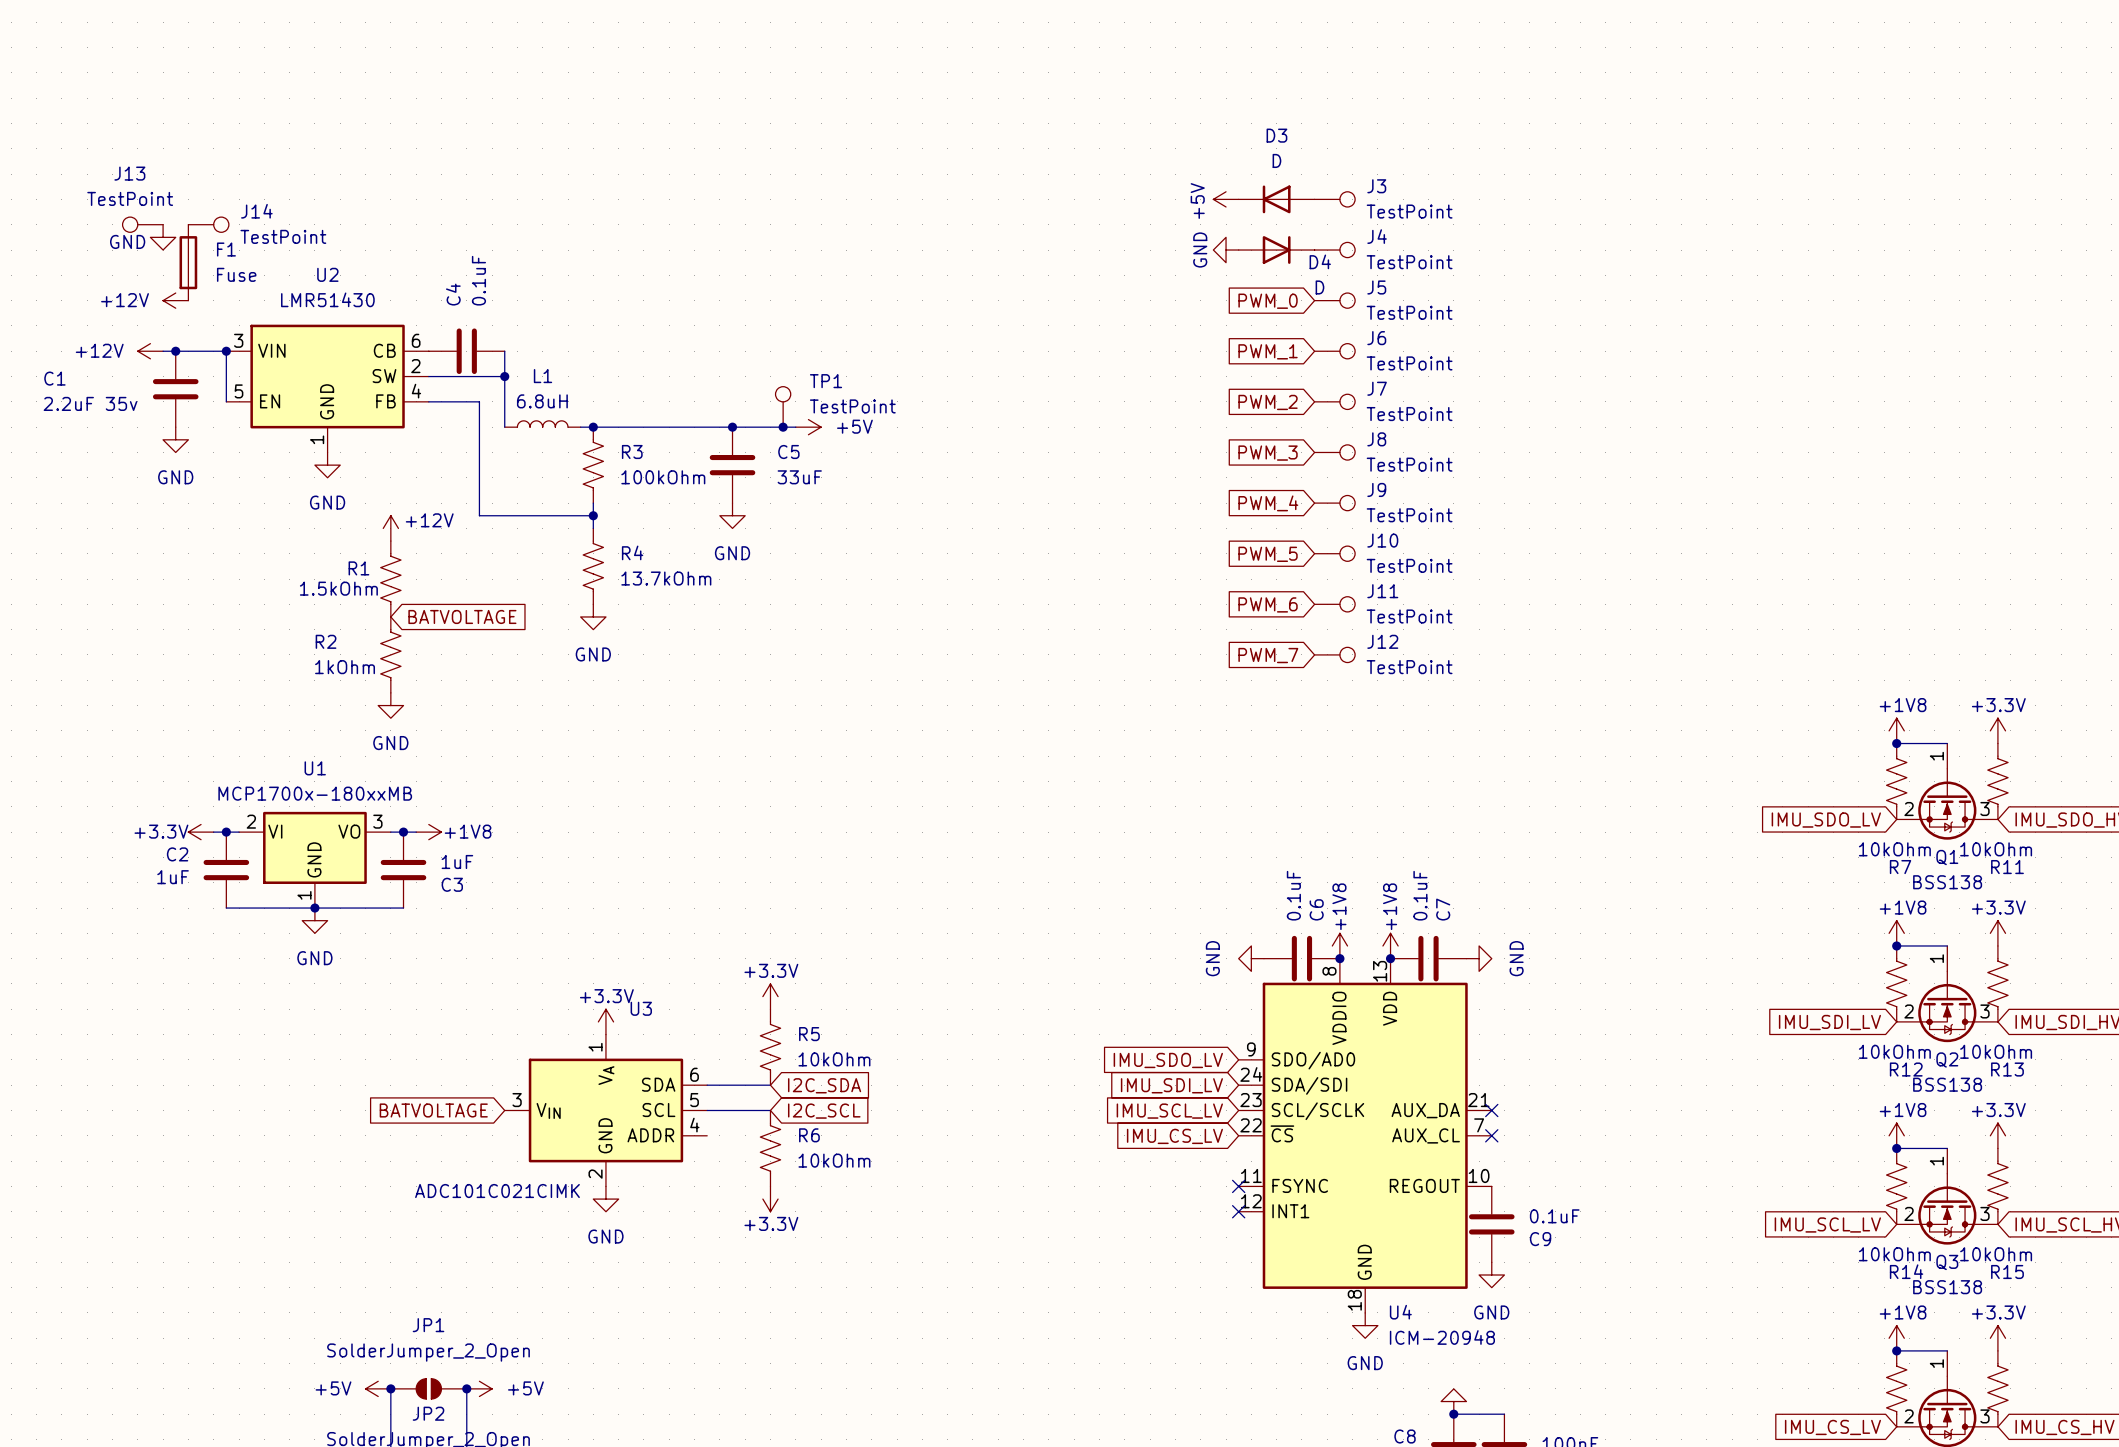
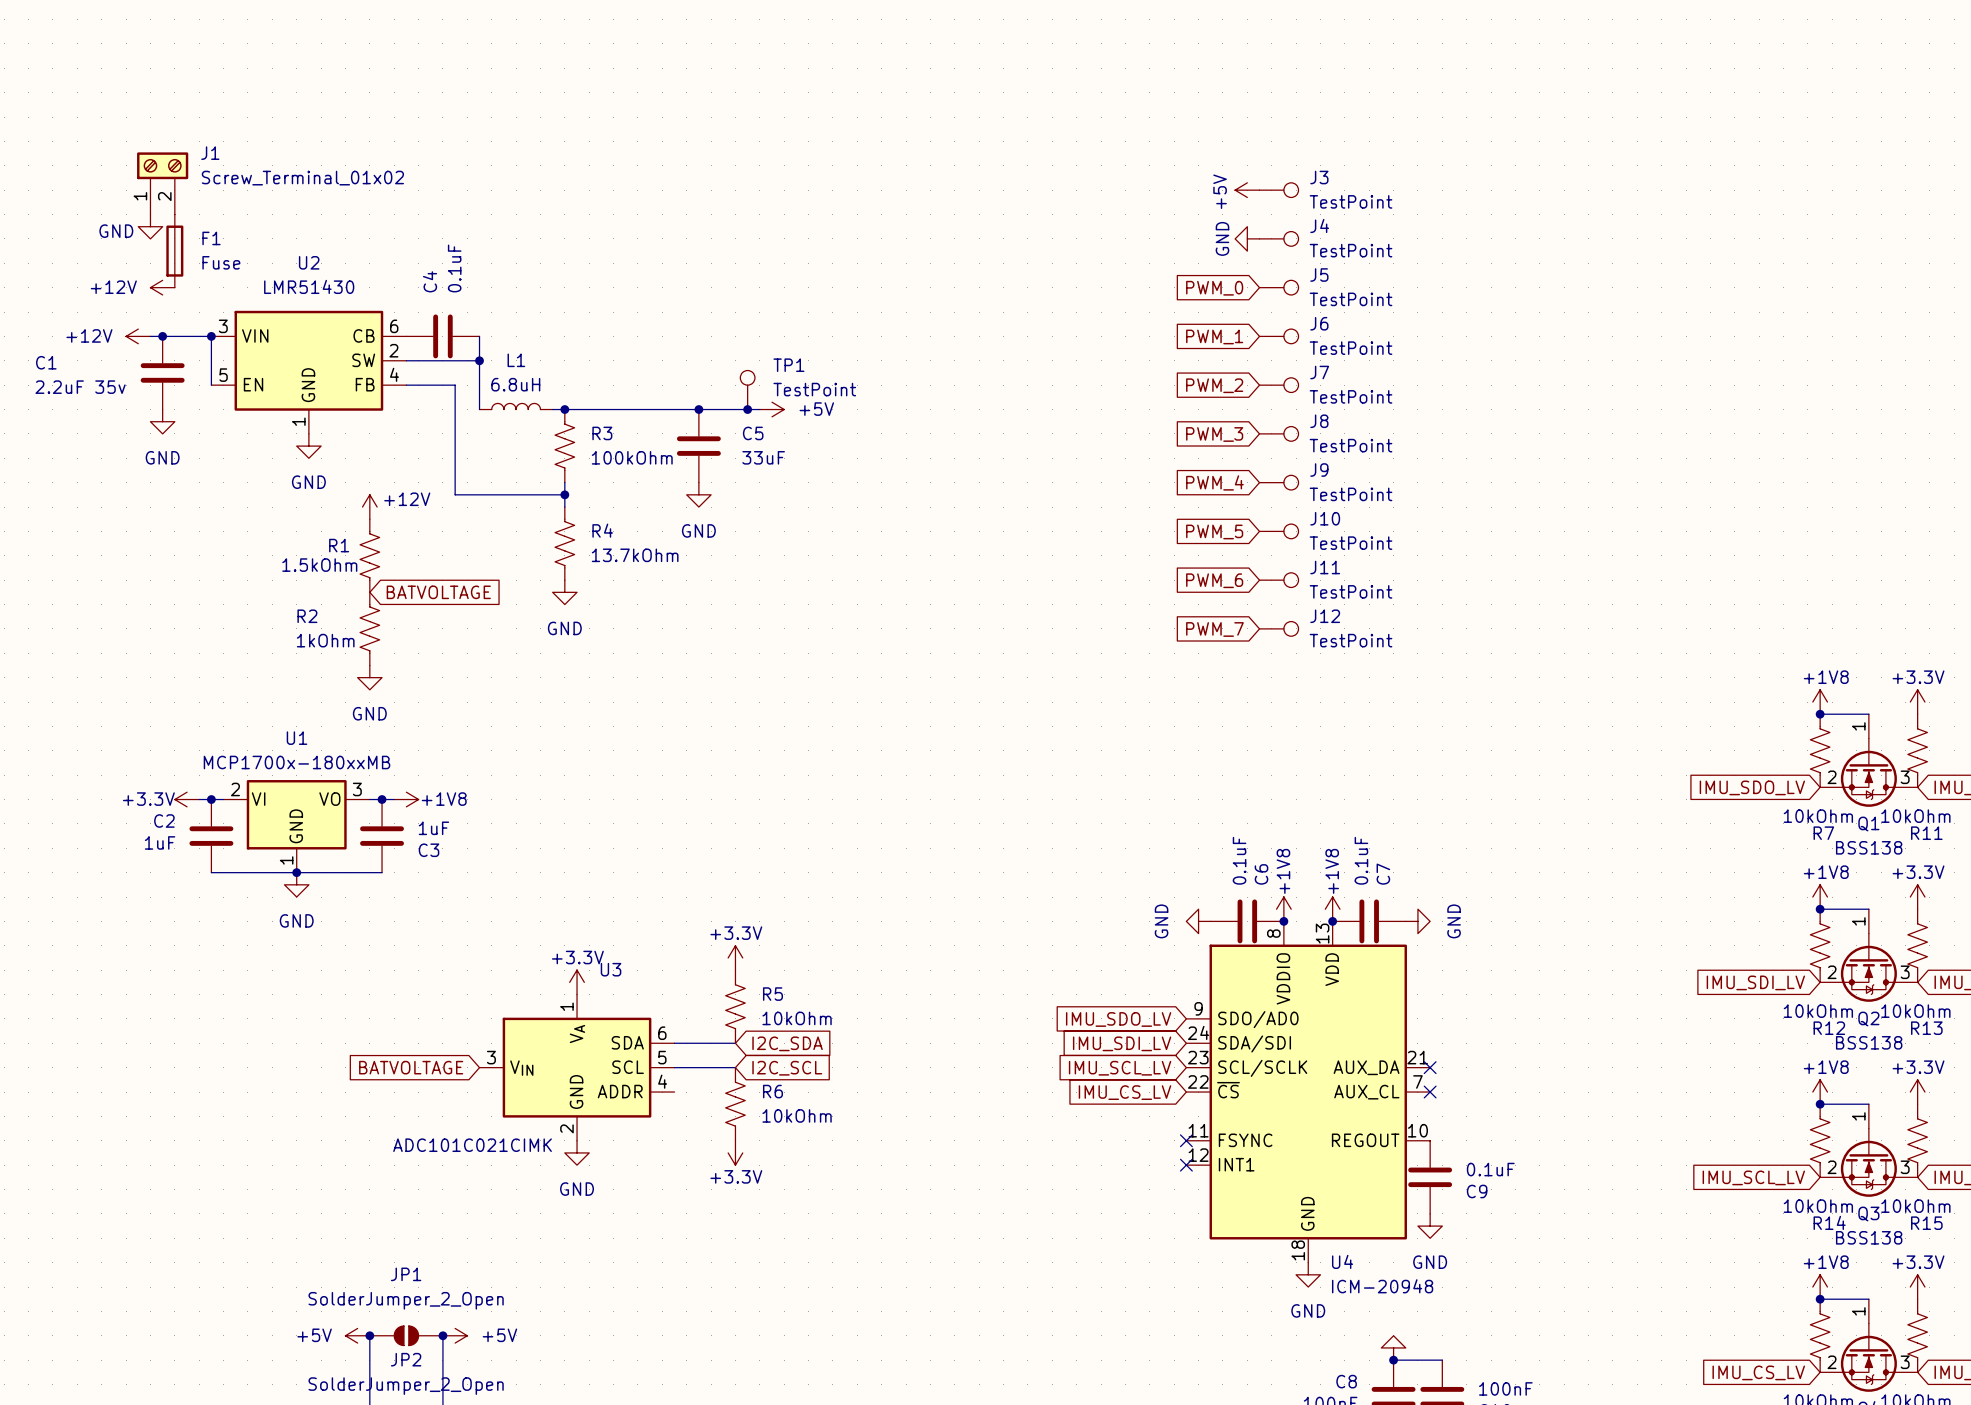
J1: none -> Screw_Terminal_01x02 (162, 183)
power symbol position: +5V (1226, 199) -> +5V (1247, 190)
D3: D (1276, 199) -> none
J13: TestPoint (142, 224) -> none
J14: TestPoint (208, 224) -> none
power symbol position: GND (1226, 250) -> GND (1247, 238)
D4: D (1276, 250) -> none

